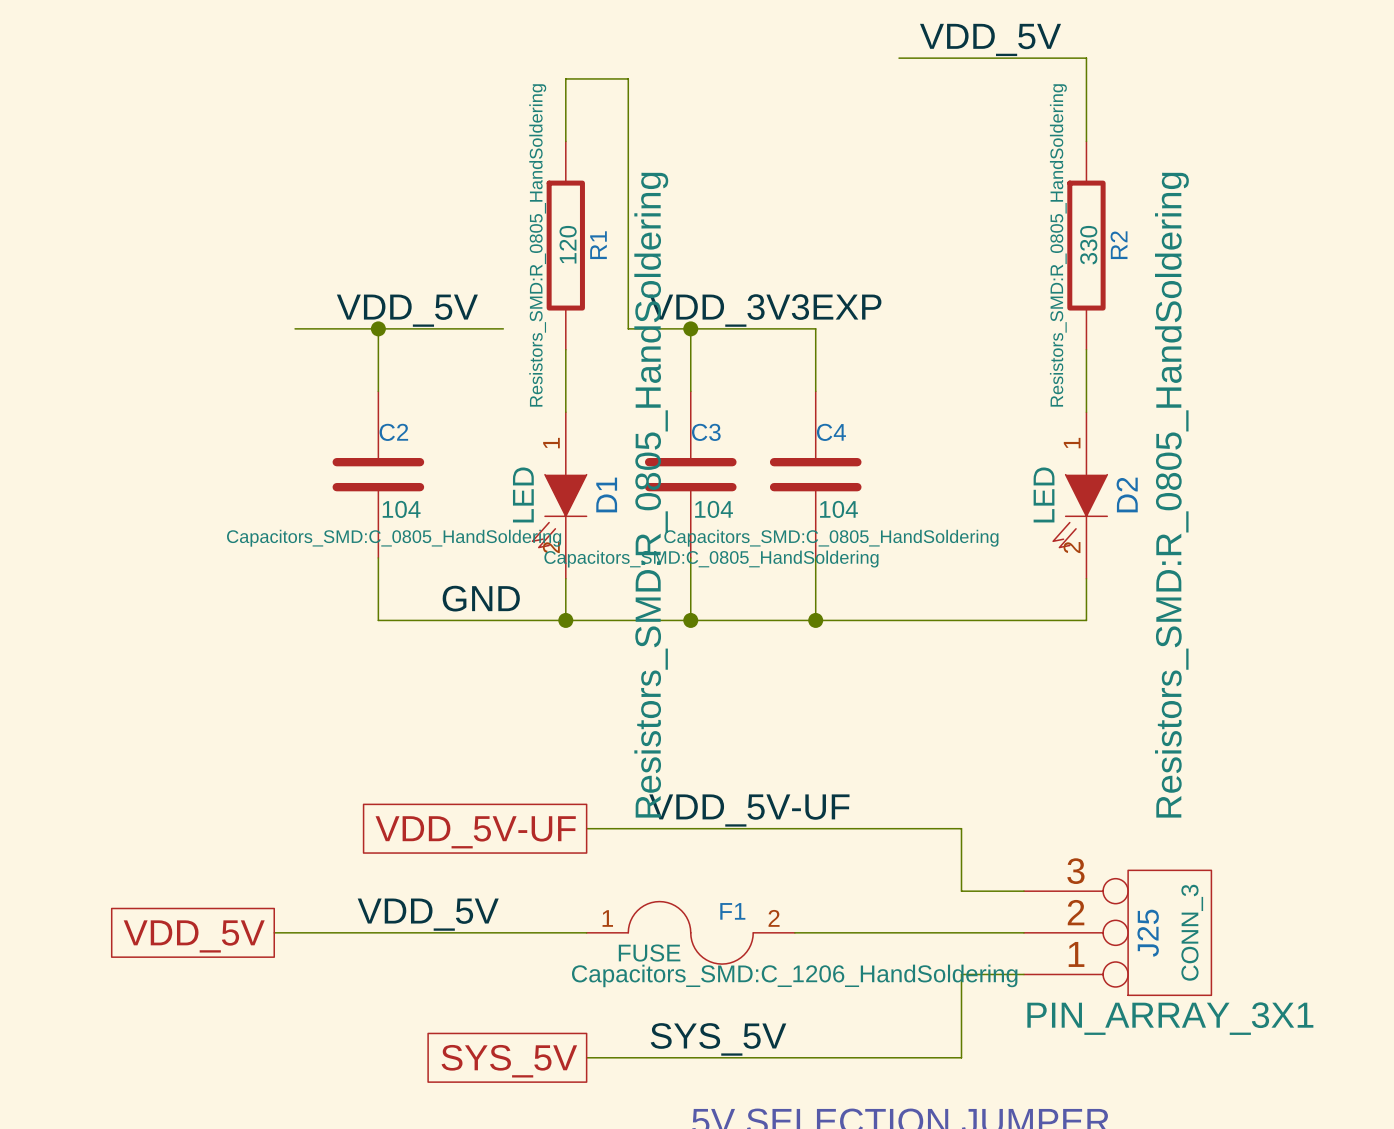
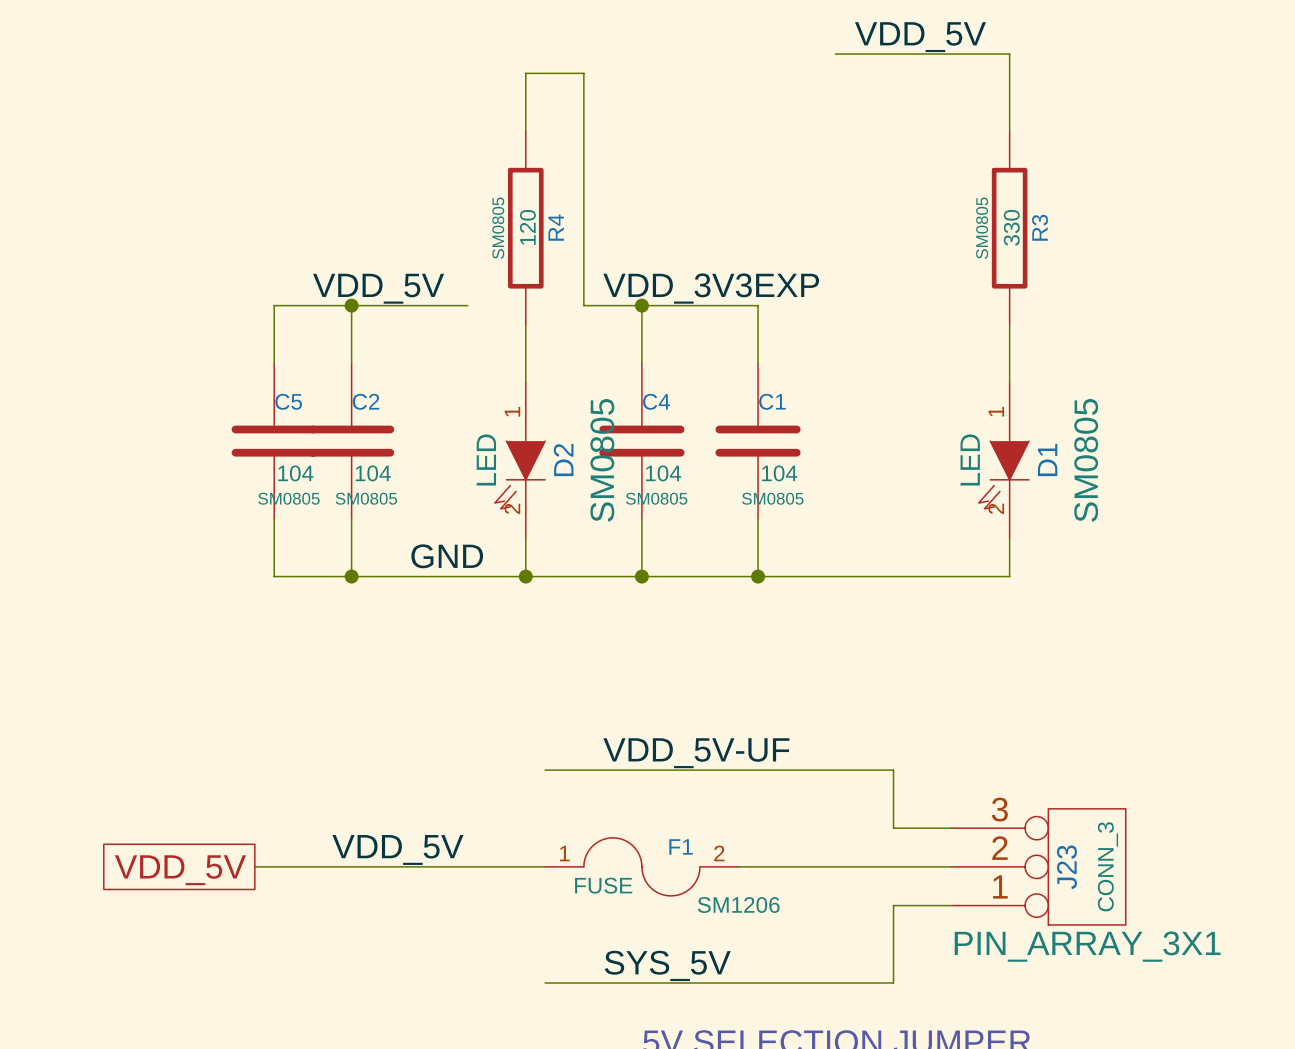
R1 text: Resistors_SMD:R_0805_HandSoldering (537, 245) -> SM0805 (498, 228)
R1 name: R1 (598, 245) -> R4 (556, 227)
R2 text: Resistors_SMD:R_0805_HandSoldering (1058, 245) -> SM0805 (982, 228)
R2 name: R2 (1119, 245) -> R3 (1040, 227)
wire: none -> (274, 305) (274, 363)
C3 name: C3 (706, 432) -> C4 (656, 401)
C4 name: C4 (831, 432) -> C1 (772, 401)
C5: none -> 104 (274, 441)
D1 name: D1 (606, 494) -> D2 (563, 460)
D1 text: Resistors_SMD:R_0805_HandSoldering (651, 495) -> SM0805 (602, 460)
D2 name: D2 (1127, 495) -> D1 (1047, 459)
D2 text: Resistors_SMD:R_0805_HandSoldering (1171, 495) -> SM0805 (1086, 460)
C2 text: Capacitors_SMD:C_0805_HandSoldering (394, 538) -> SM0805 (366, 498)
C4 text: Capacitors_SMD:C_0805_HandSoldering (831, 538) -> SM0805 (772, 498)
wire: none -> (274, 518) (274, 576) (351, 576)
C3 text: Capacitors_SMD:C_0805_HandSoldering (711, 559) -> SM0805 (656, 498)
junction: none -> (351, 576)
global label: VDD_5V-UF (475, 832) -> none
J25 name: J25 (1148, 933) -> J23 (1066, 867)
F1 text: Capacitors_SMD:C_1206_HandSoldering (794, 975) -> SM1206 (738, 905)
global label: SYS_5V (509, 1061) -> none

